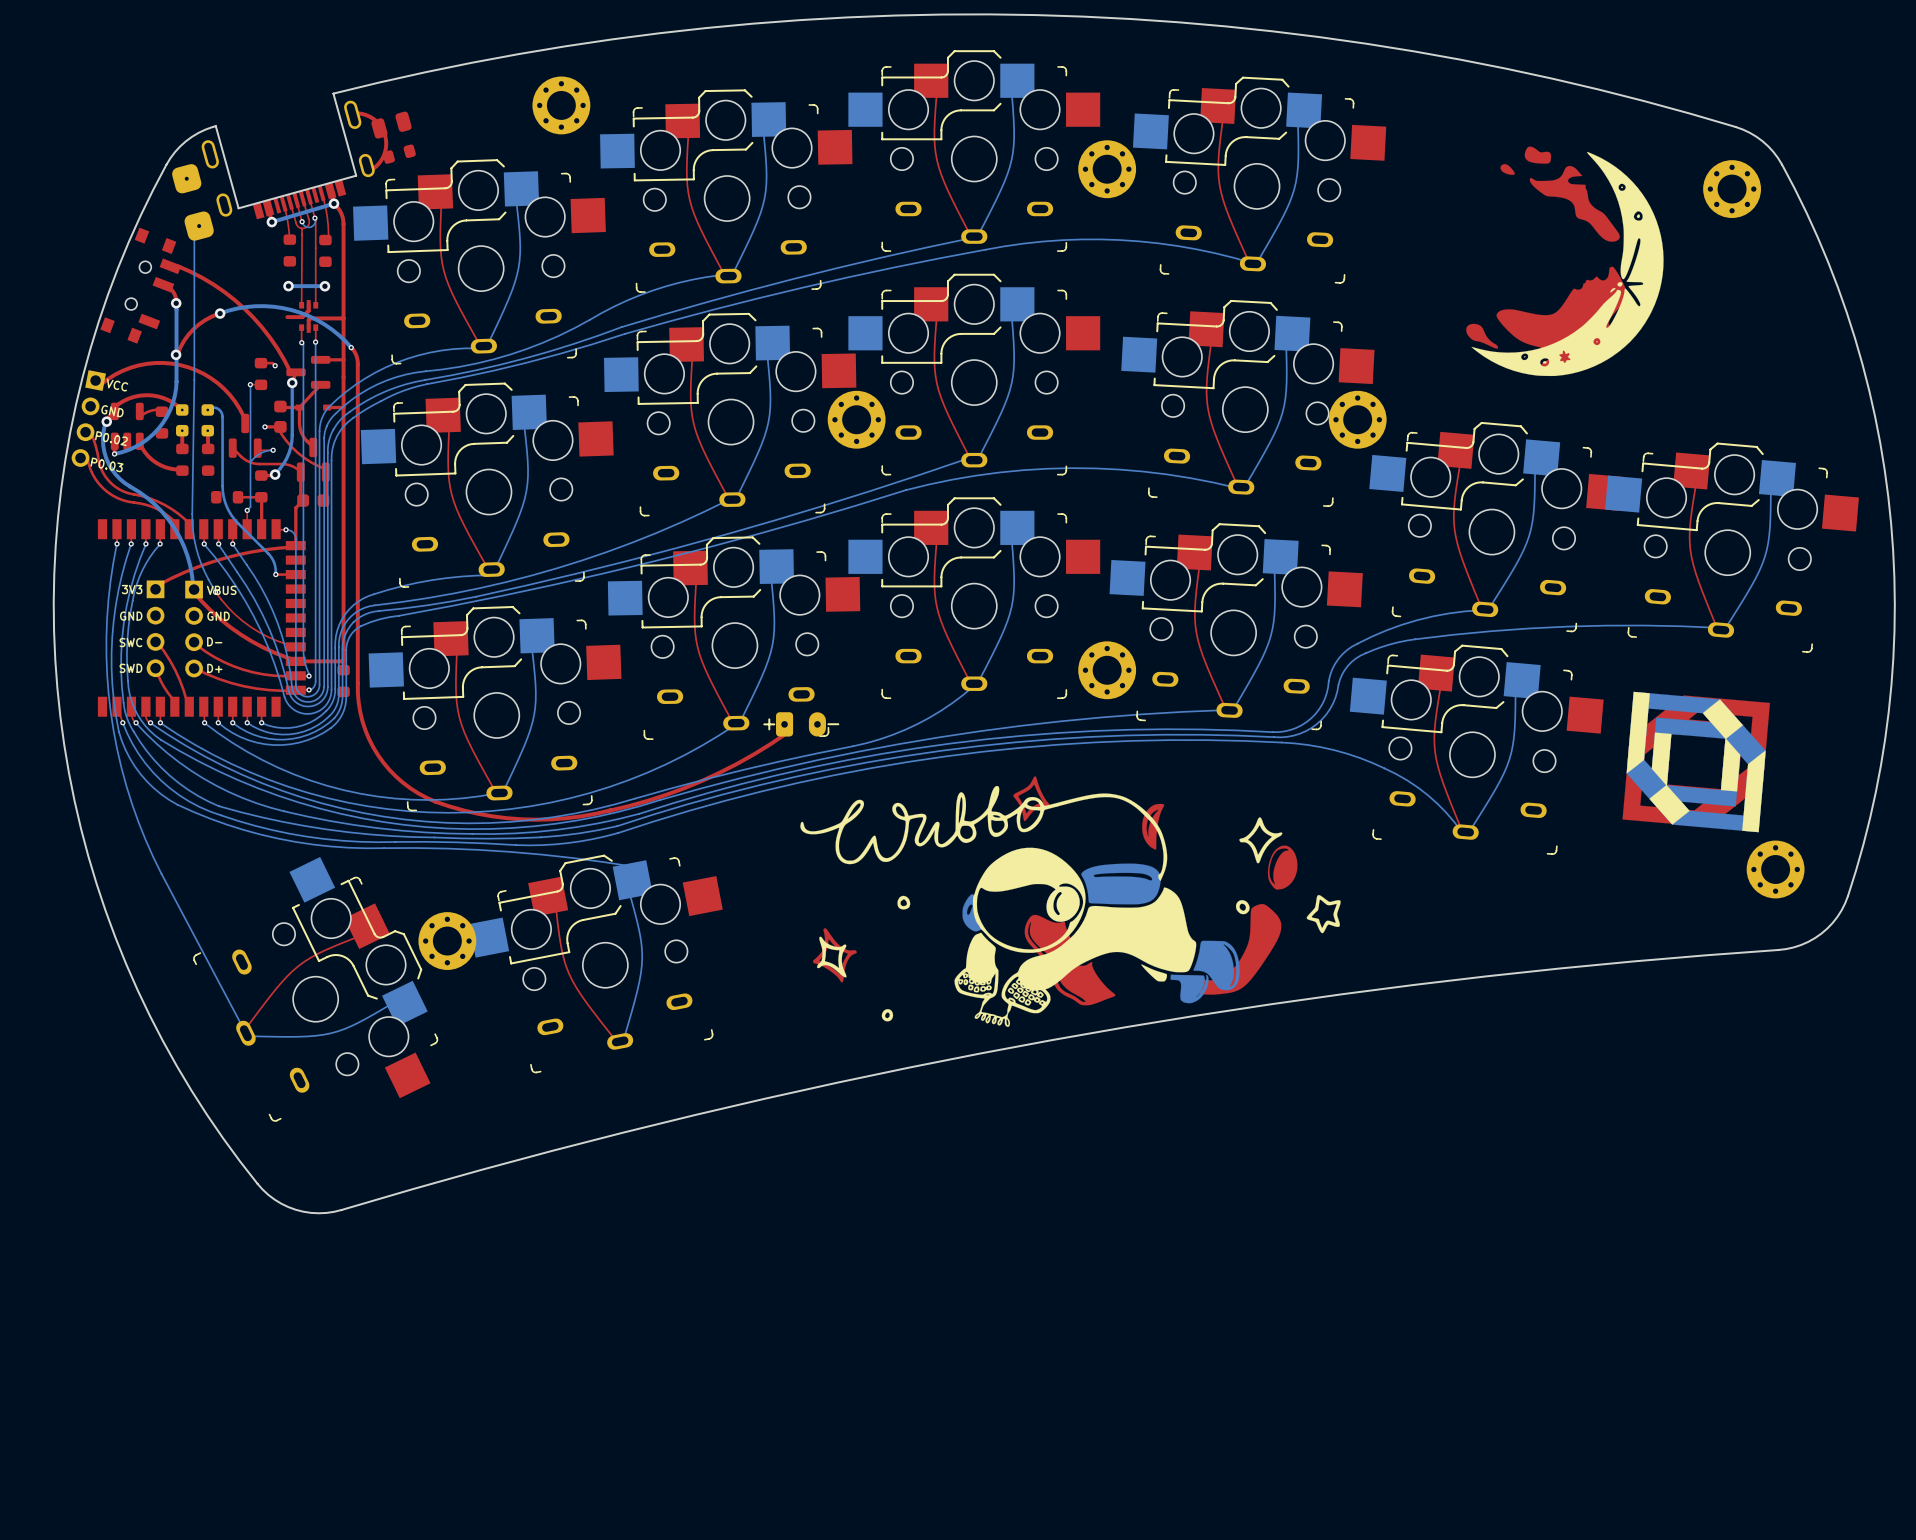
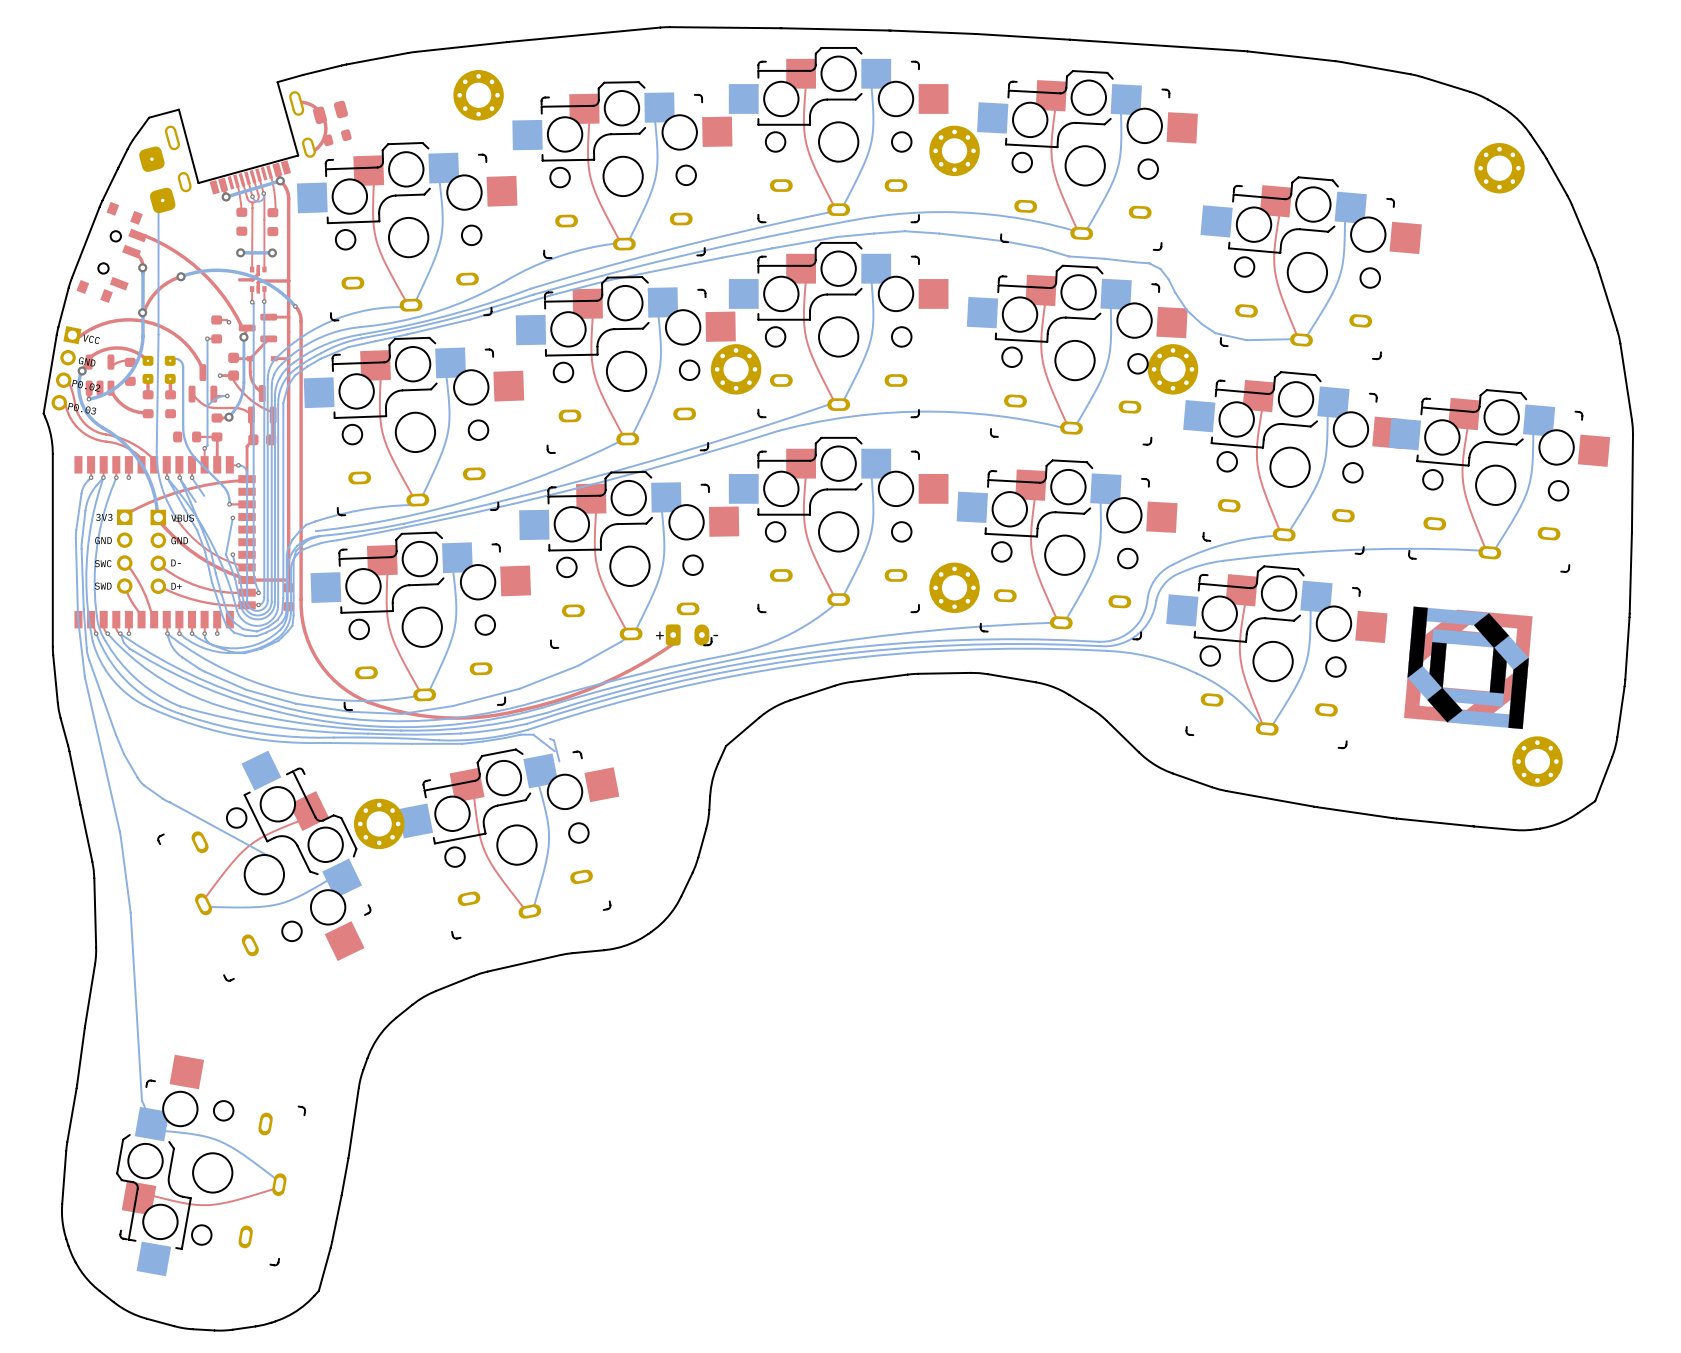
board edge: (333, 93) (356, 175) (238, 208) (215, 126) (198, 132) (185, 141) (166, 164) (140, 215) (118, 268) (98, 321) (82, 376) (65, 460) (58, 517) (54, 574) (55, 659) (64, 744) (81, 828) (105, 910) (137, 990) (163, 1041) (191, 1090) (223, 1138) (257, 1183) (268, 1194) (281, 1203) (295, 1209) (310, 1212) (334, 1211) (552, 1150) (694, 1115) (909, 1067) (1124, 1027) (1341, 994) (1487, 976) (1632, 961) (1786, 949) (1808, 941) (1821, 933) (1832, 922) (1841, 910) (1856, 870) (1870, 818) (1880, 765) (1888, 712) (1893, 658) (1894, 604) (1893, 550) (1888, 496) (1880, 443) (1869, 390) (1855, 338) (1837, 287) (1817, 237) (1782, 164) (1768, 146) (1749, 132) (1690, 113) (1598, 89) (1506, 68) (1413, 51) (1319, 37) (1225, 26) (1131, 19) (1036, 15) (894, 15) (800, 20) (705, 28) (612, 39) (518, 54) (425, 72) (333, 93) -> (670, 27) (889, 30) (975, 33) (1247, 51) (1338, 61) (1416, 75) (1479, 95) (1511, 113) (1526, 128) (1546, 158) (1569, 200) (1594, 259) (1619, 336) (1631, 419) (1631, 532) (1629, 615) (1625, 683) (1615, 747) (1595, 801) (1559, 823) (1540, 828) (1519, 830) (1392, 818) (1226, 791) (1172, 773) (1154, 764) (1099, 714) (1058, 689) (1041, 683) (987, 674) (912, 674) (851, 681) (790, 700) (763, 714) (725, 746) (712, 779) (707, 824) (695, 865) (677, 903) (657, 927) (641, 938) (619, 947) (560, 955) (473, 975) (423, 997) (384, 1029) (370, 1050) (361, 1074) (331, 1244) (318, 1290) (308, 1301) (289, 1315) (275, 1321) (228, 1330) (183, 1328) (134, 1314) (113, 1302) (94, 1287) (82, 1273) (69, 1250) (62, 1215) (66, 1146) (96, 947) (93, 870) (57, 702) (52, 646) (52, 447) (49, 428) (43, 413) (57, 331) (68, 288) (101, 203) (129, 145) (149, 117) (178, 109) (198, 183) (298, 155) (277, 82) (344, 64) (411, 52) (670, 27)
drawing: [1466, 146, 1664, 377] -> none
part: none -> (1311, 268)
bottom track: none -> (1301, 339) (1246, 340) (1215, 333) (1186, 310) (1160, 269) (1149, 263) (1068, 256) (1042, 248) (1005, 241) (904, 231) (837, 236) (607, 280) (470, 319) (348, 347) (307, 366) (294, 375) (287, 386) (283, 403) (282, 613) (277, 619) (268, 626) (256, 631) (243, 629) (234, 622) (227, 611) (211, 552) (179, 477)
bottom track: (116, 543) (107, 618) (107, 675) (110, 712) (126, 786) (138, 822) (161, 874) -> (91, 477) (82, 491) (75, 533) (78, 618) (84, 677) (120, 837) (130, 912) (141, 1100) (152, 1124)
bottom track: none -> (103, 477) (93, 489) (87, 501) (81, 542) (83, 609) (87, 654) (123, 754) (141, 783) (169, 802)
bottom track: (160, 544) (146, 563) (134, 592) (127, 640) (128, 687) (134, 707) (150, 731) (160, 739) (198, 761) (257, 788) (319, 808) (361, 818) (425, 827) (490, 828) (533, 826) (597, 816) (660, 799) -> (120, 633) (123, 642) (129, 648) (198, 684) (268, 709) (323, 720) (378, 726) (452, 724) (507, 716) (565, 700)
bottom track: (246, 564) (267, 598) (277, 622) (288, 661) (292, 687) -> (232, 554) (239, 577) (243, 602)
bottom track: (237, 572) (254, 600) (269, 629) (280, 660) (289, 692) -> (232, 517) (225, 554) (235, 578) (241, 606)
via: none -> (232, 517)
bottom track: (374, 594) (353, 605) (339, 624) (335, 641) (334, 694) (328, 708) (315, 719) (296, 727) (275, 727) (262, 723) -> (315, 521) (306, 524) (299, 531) (287, 548) (286, 609) (282, 622) (266, 632) (256, 636) (245, 636) (234, 632) (225, 624) (197, 530) (167, 477)
bottom track: (374, 605) (364, 607) (351, 615) (340, 632) (338, 642) (338, 699) (335, 708) (329, 716) (310, 728) (289, 734) (267, 732) (247, 722) -> (319, 536) (308, 539) (295, 551) (293, 560) (292, 625) (278, 640) (261, 648) (244, 653) (231, 652) (212, 645) (205, 638) (204, 633)
via: none -> (232, 554)
bottom track: (160, 723) (195, 744) (231, 763) (288, 786) (327, 798) (367, 806) (407, 811) (448, 812) (489, 811) (530, 806) (570, 798) (609, 787) (647, 772) (684, 755) (736, 723) -> (167, 633) (173, 648) (182, 657) (201, 670) (246, 689) (295, 703) (349, 711) (401, 714) (453, 706) (519, 688) (578, 665) (631, 634)
drawing: [800, 776, 1341, 1027] -> none
bottom track: none -> (550, 738) (553, 740) (559, 761)
bottom track: (384, 848) (510, 851) (635, 867) -> (324, 742) (462, 743) (520, 734) (533, 734) (554, 751)
bottom track: (161, 873) (245, 1033) -> none
bottom track: none -> (169, 802) (279, 861)
part: none -> (211, 1165)

